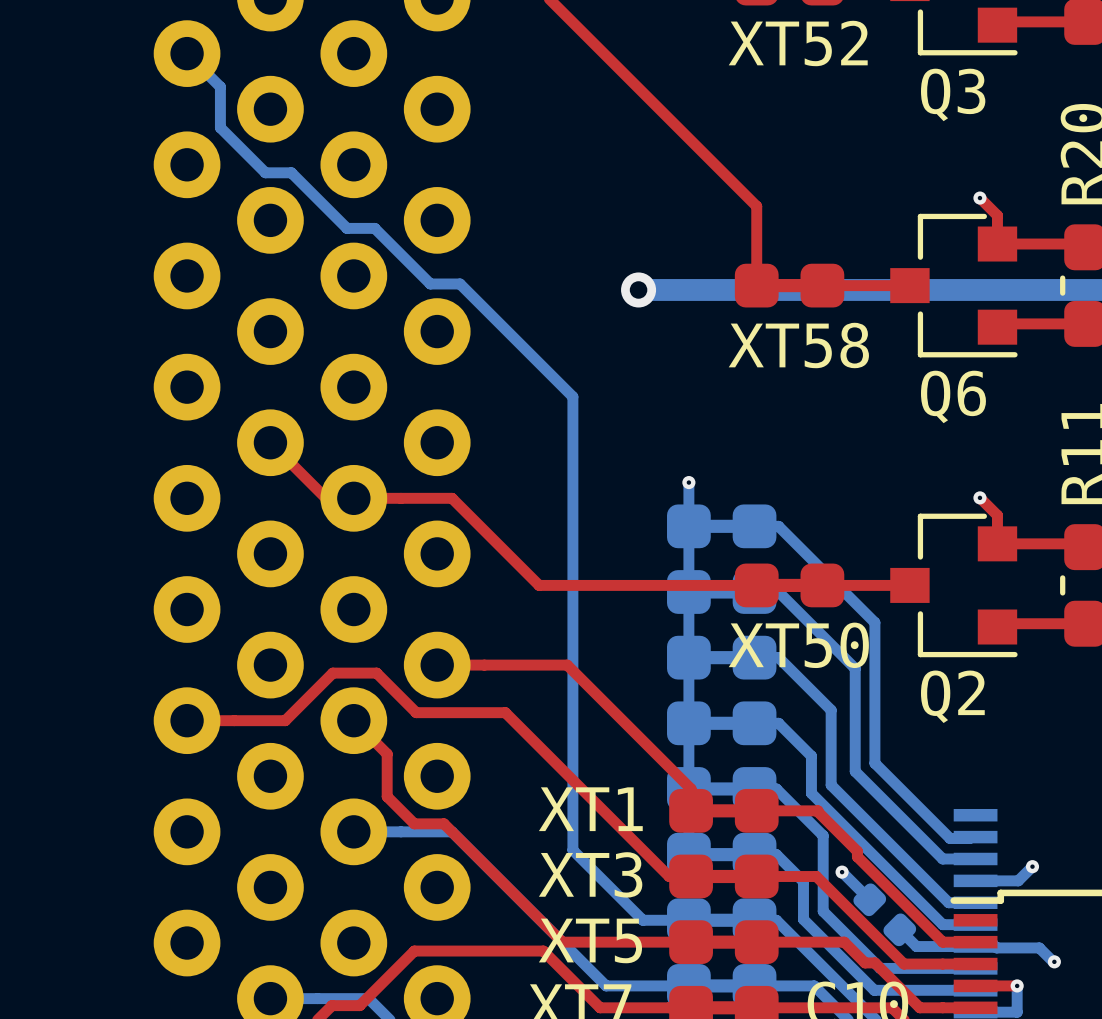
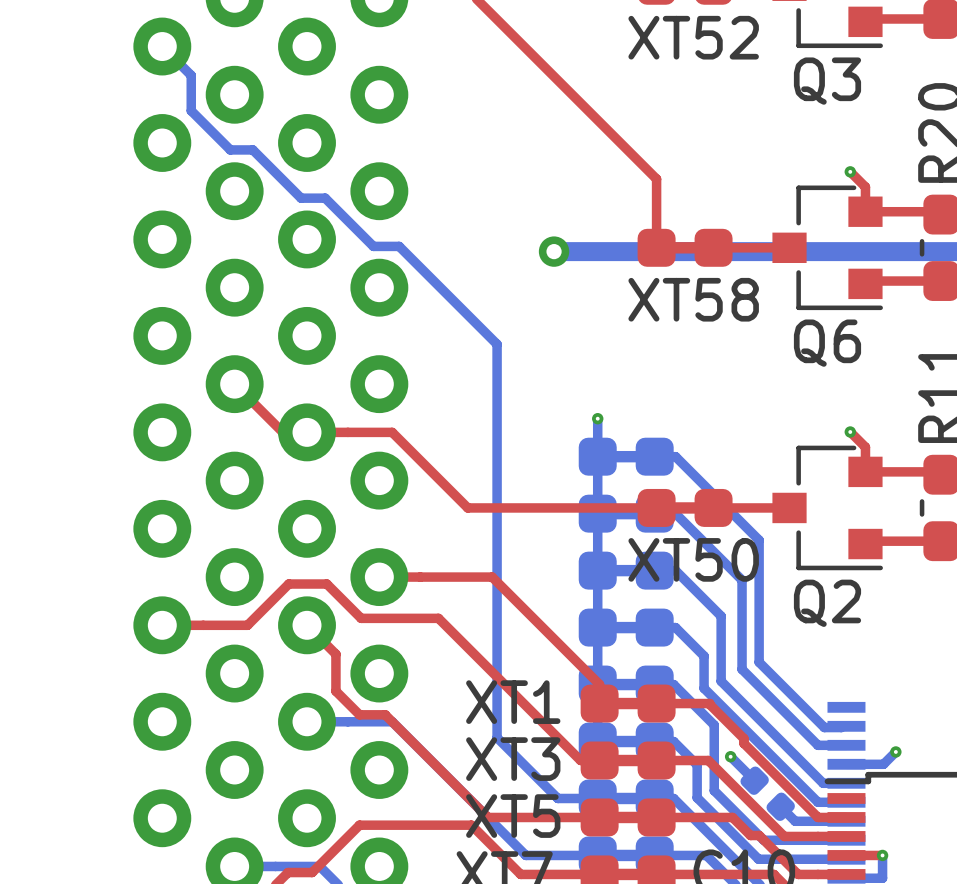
bottom track: (975, 946) (1039, 947) (1054, 961) -> none
via: (1054, 961) -> none

